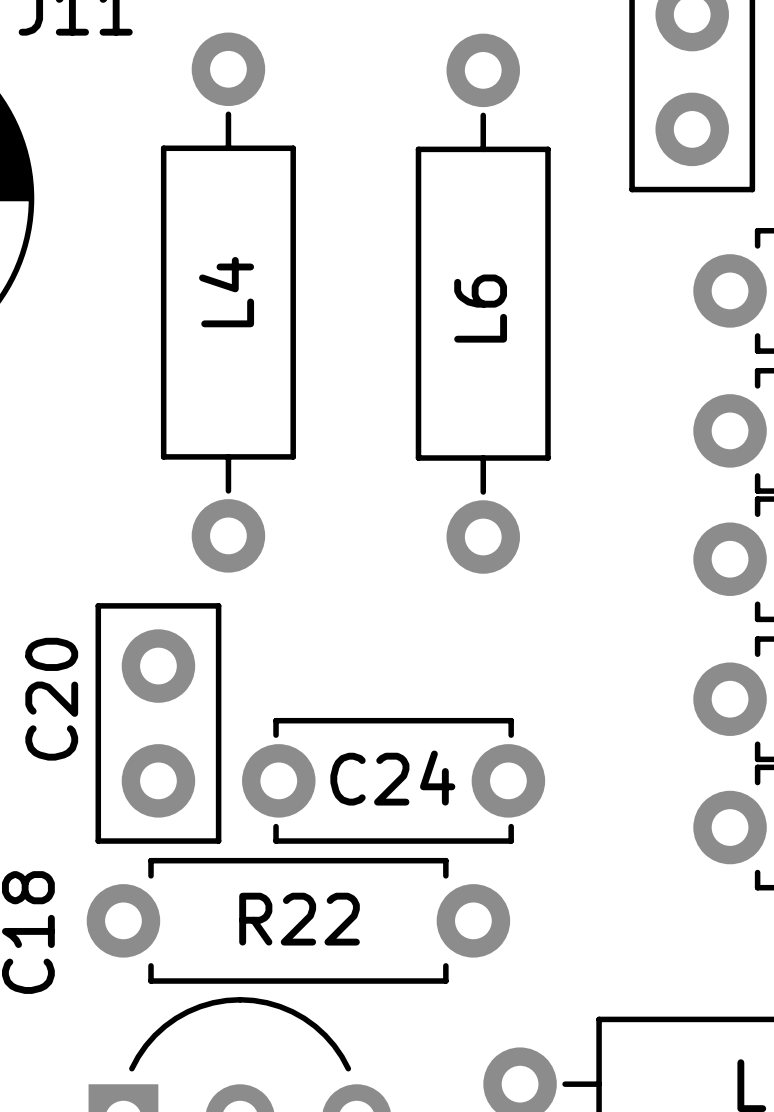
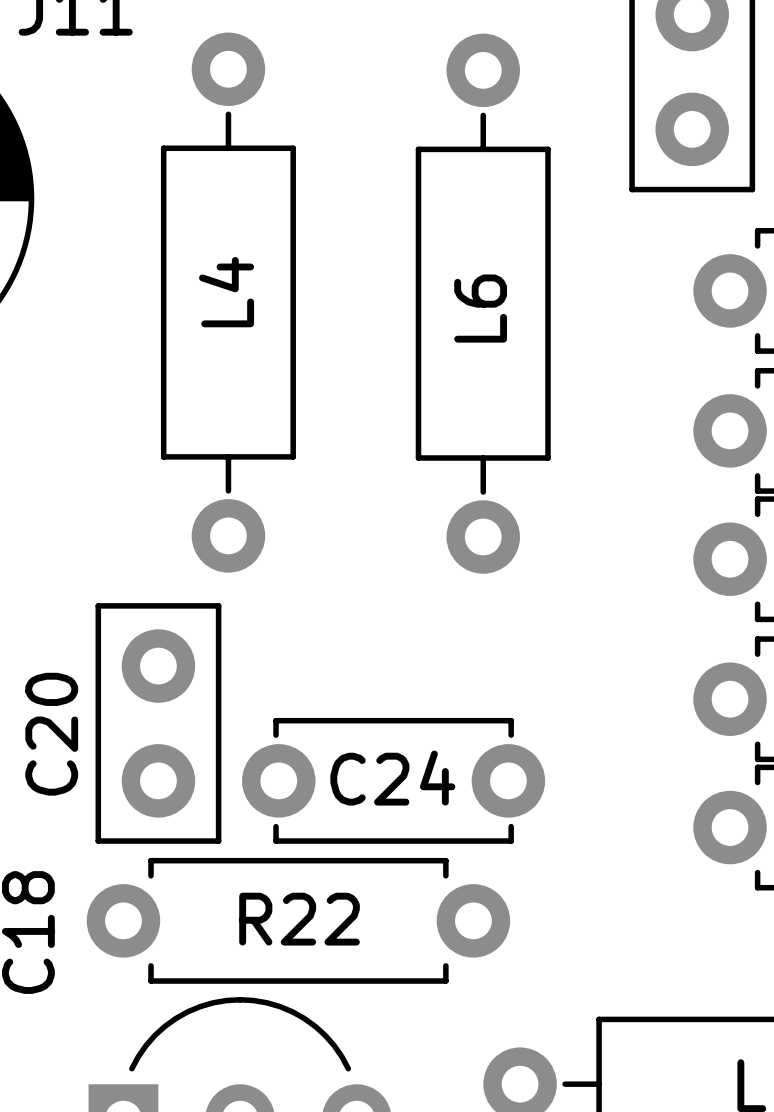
C20 name position: C20 (51, 699) -> C20 (51, 734)

